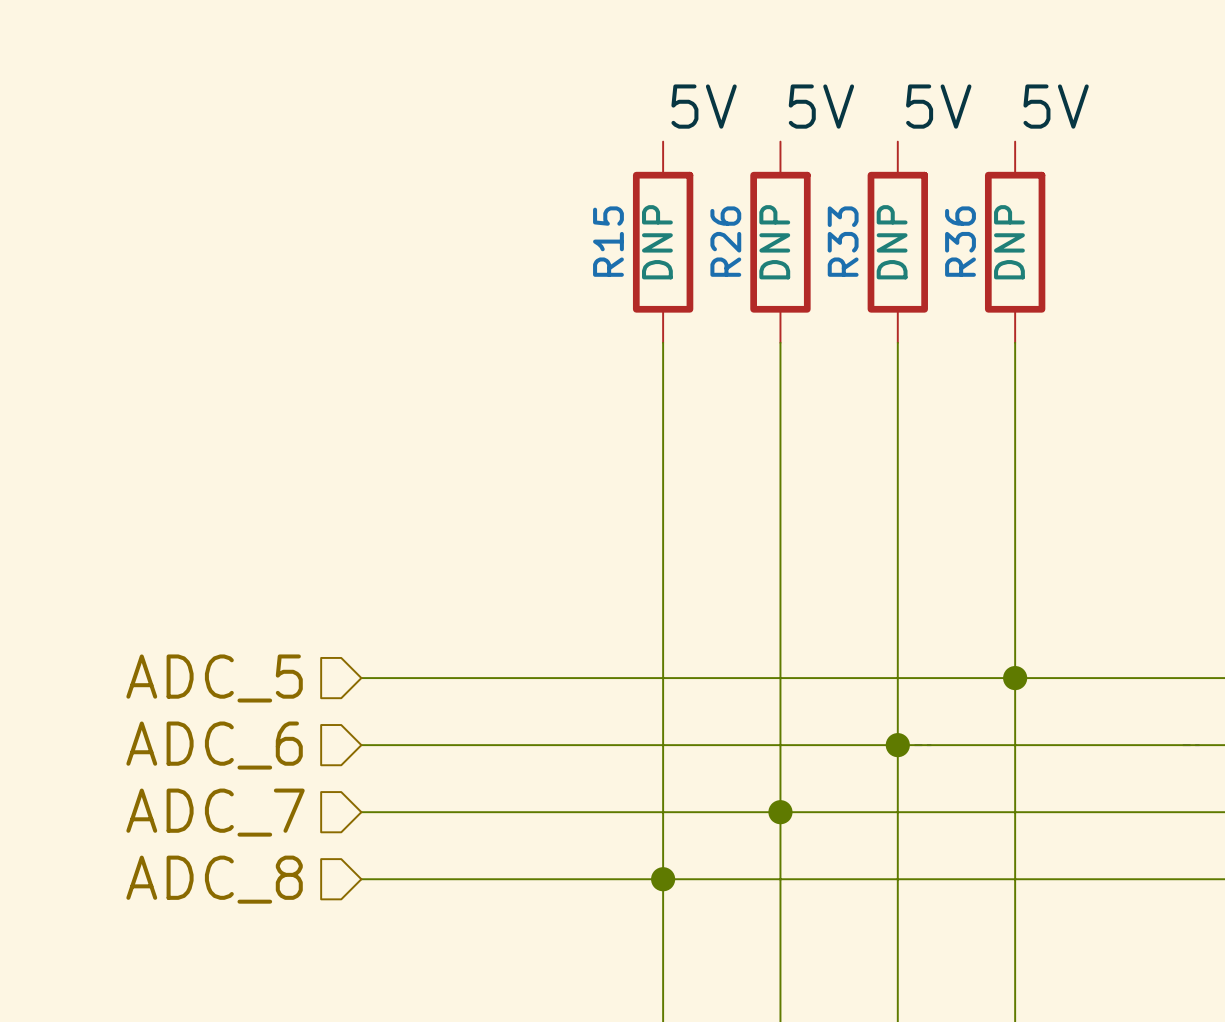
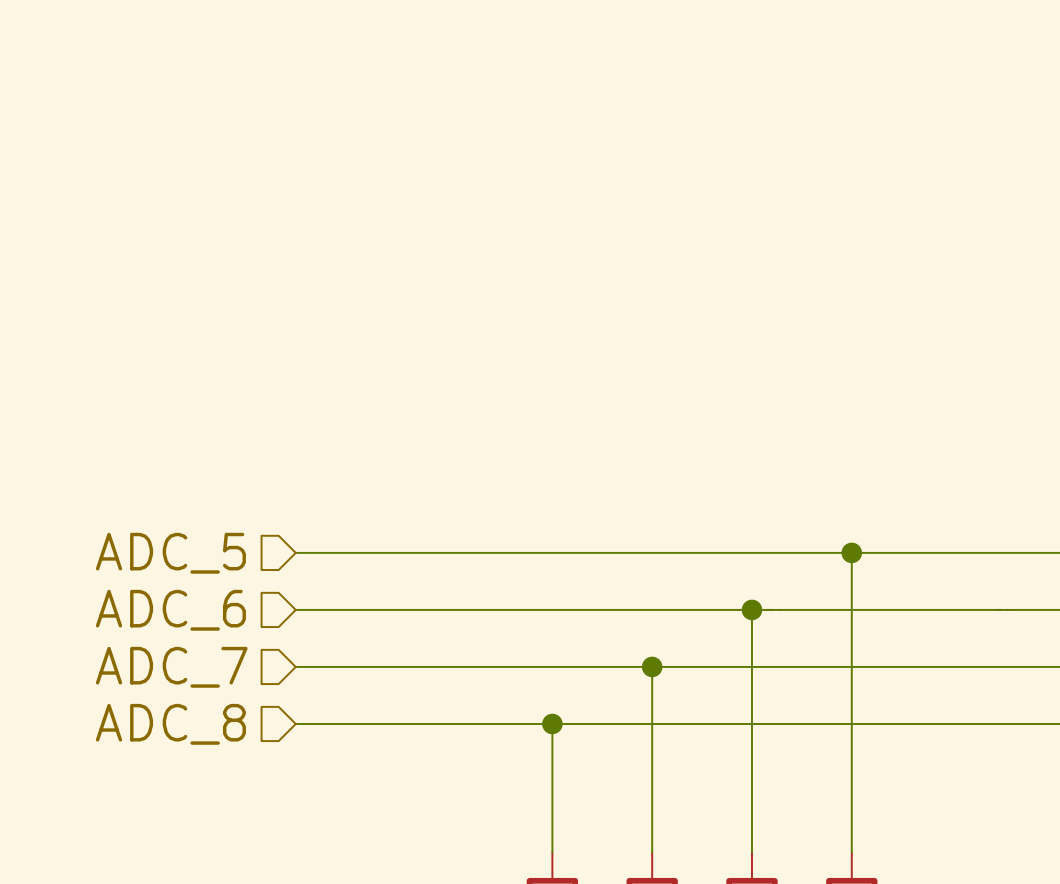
label: 5V (704, 106) -> none
label: 5V (821, 106) -> none
label: 5V (938, 106) -> none
label: 5V (1056, 106) -> none
R15: DNP (663, 242) -> none
R26: DNP (780, 242) -> none
R33: DNP (897, 242) -> none
R36: DNP (1015, 242) -> none
wire: (663, 342) (663, 879) -> none
wire: (780, 342) (780, 812) -> none
wire: (897, 342) (897, 745) -> none
wire: (1015, 342) (1015, 678) -> none

